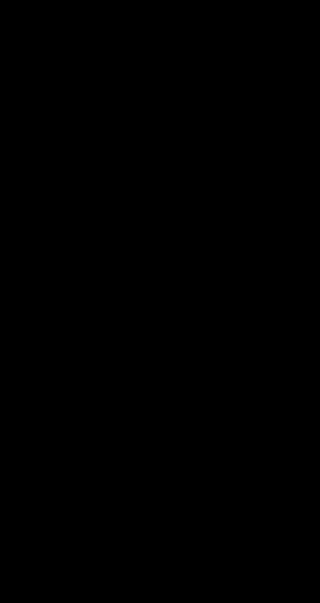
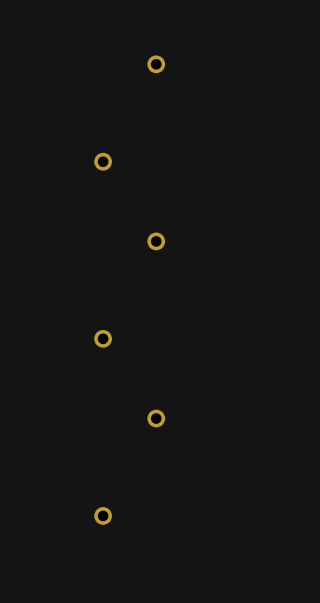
via: none -> (156, 64)
via: none -> (103, 161)
via: none -> (156, 241)
via: none -> (103, 338)
via: none -> (156, 418)
via: none -> (103, 515)

